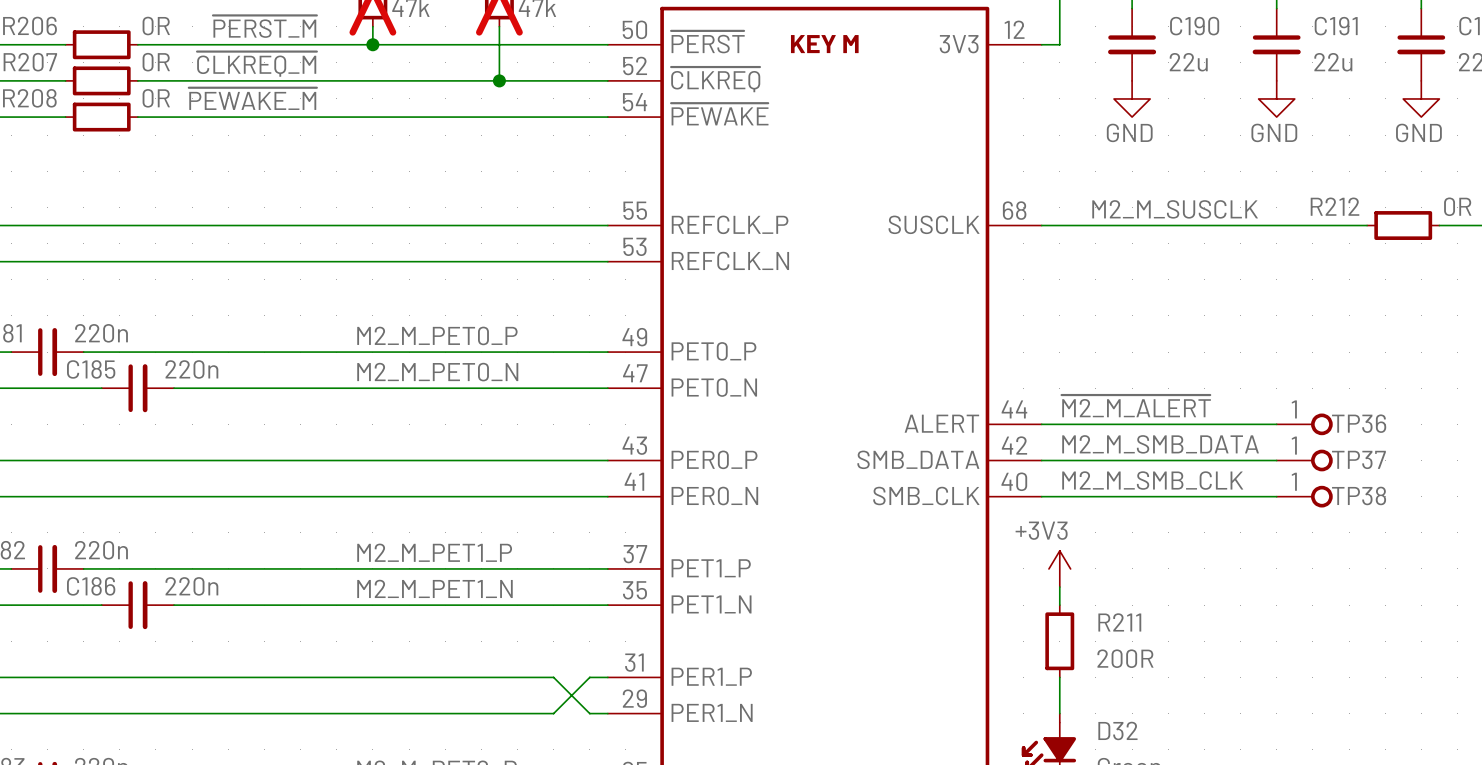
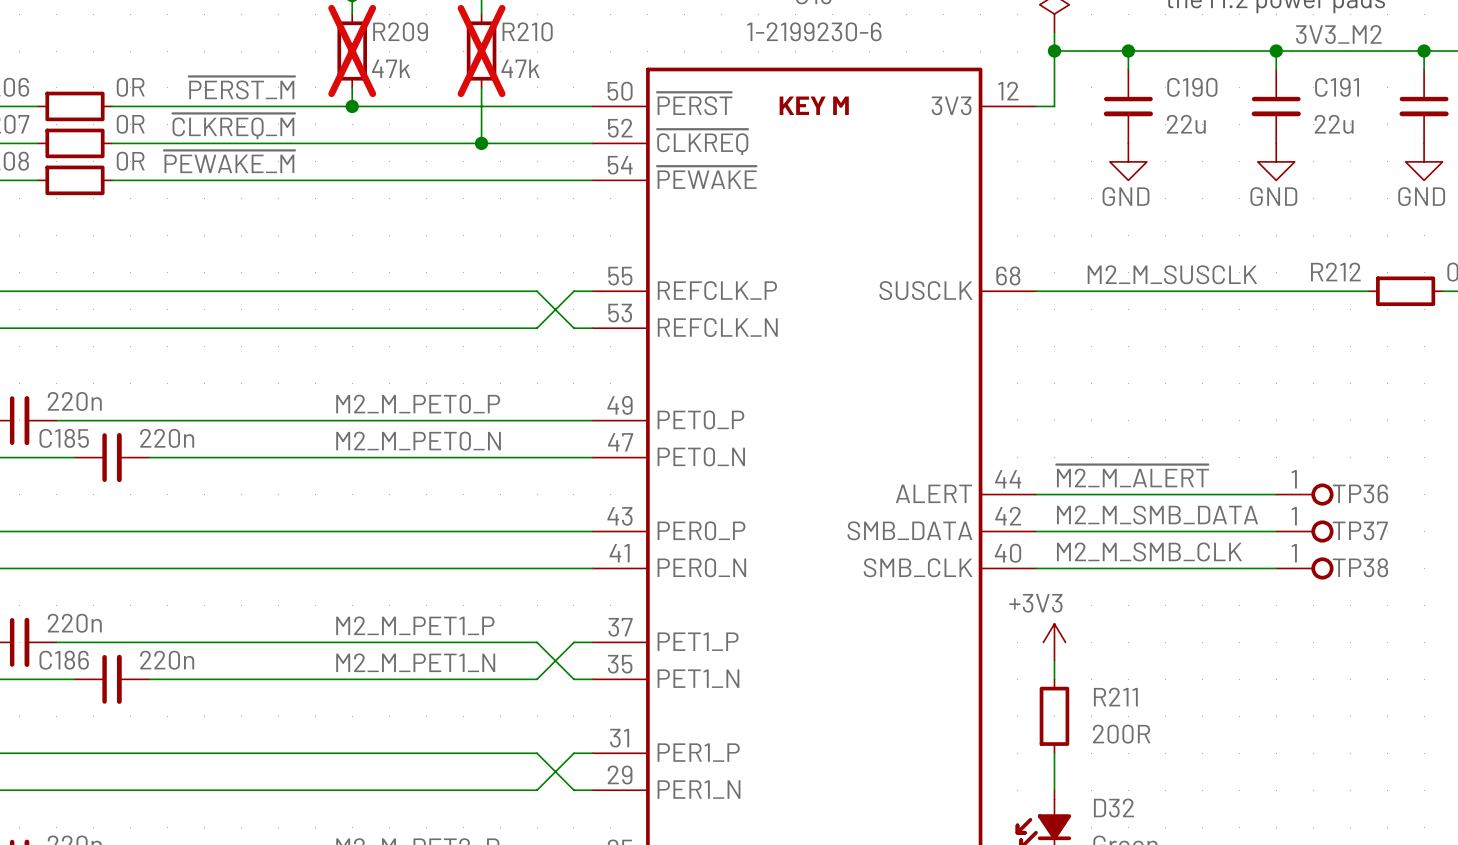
wire: (553, 225) (589, 225) -> (537, 291) (573, 328)
wire: (553, 261) (589, 261) -> (537, 328) (573, 291)
wire: (553, 568) (589, 568) -> (537, 642) (573, 679)
wire: (553, 605) (589, 605) -> (537, 679) (573, 642)

